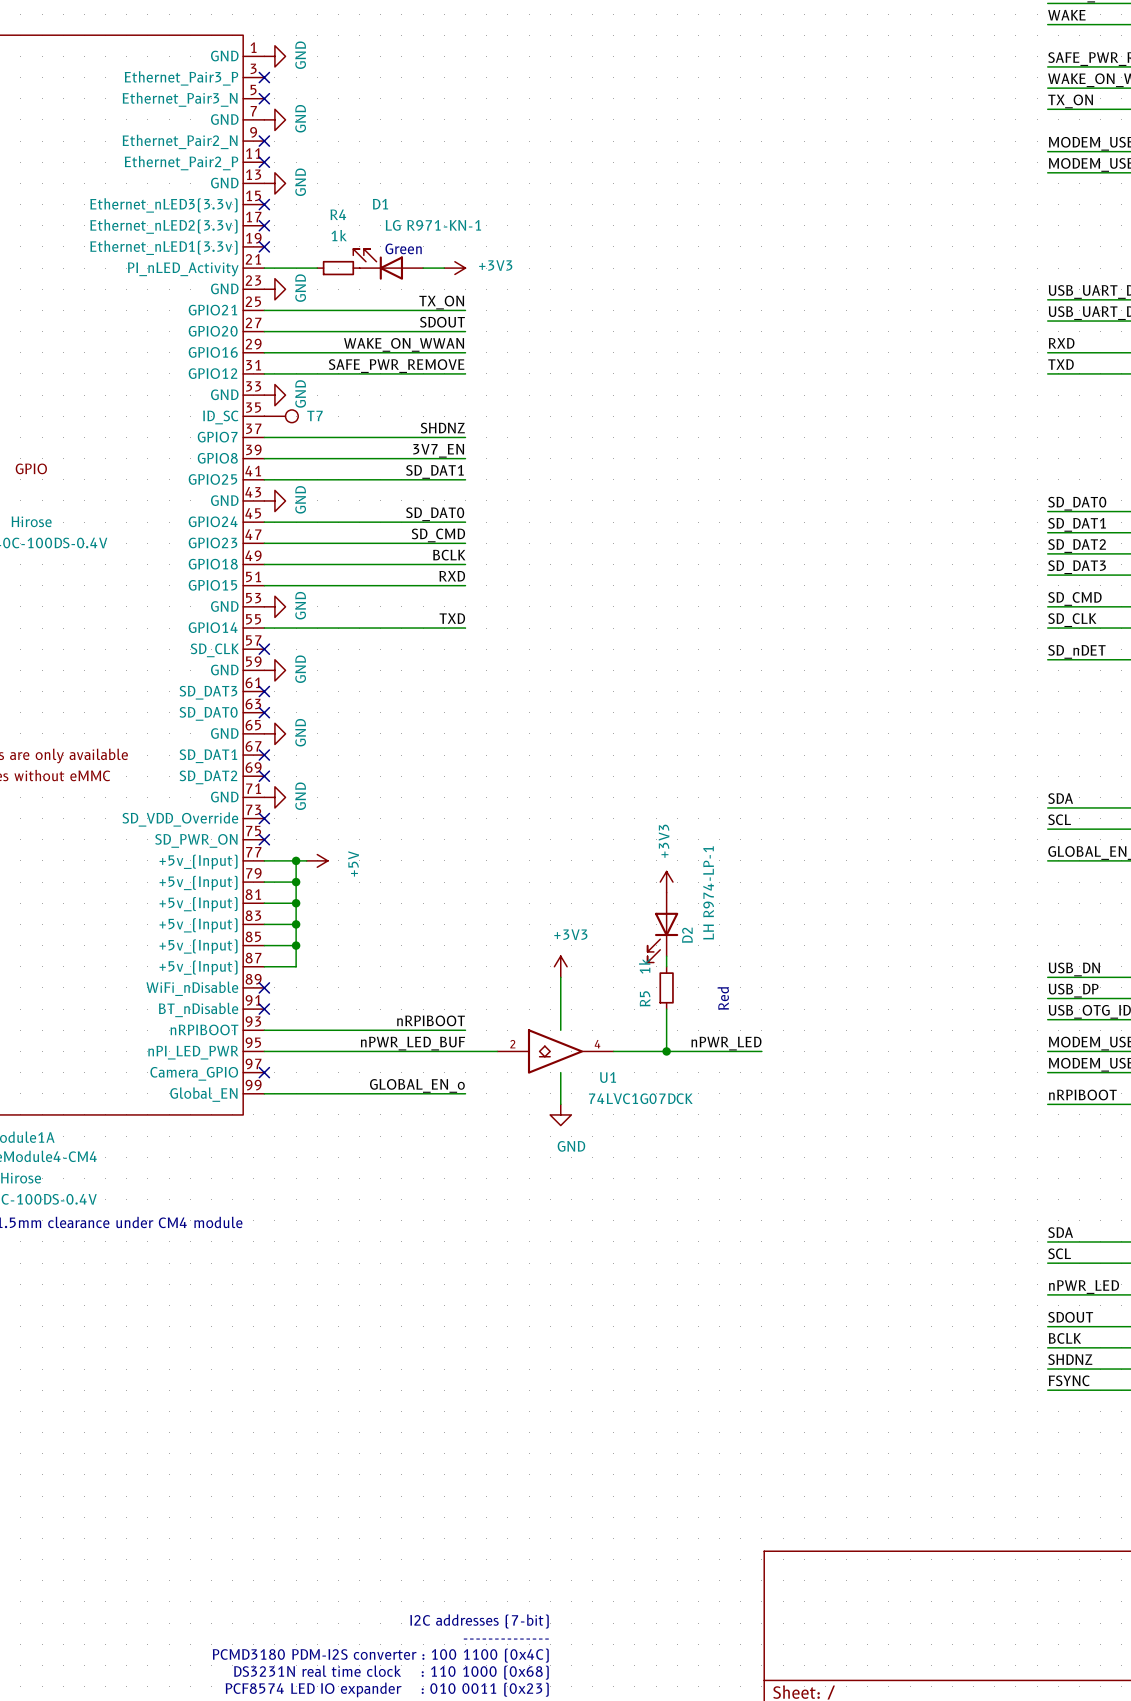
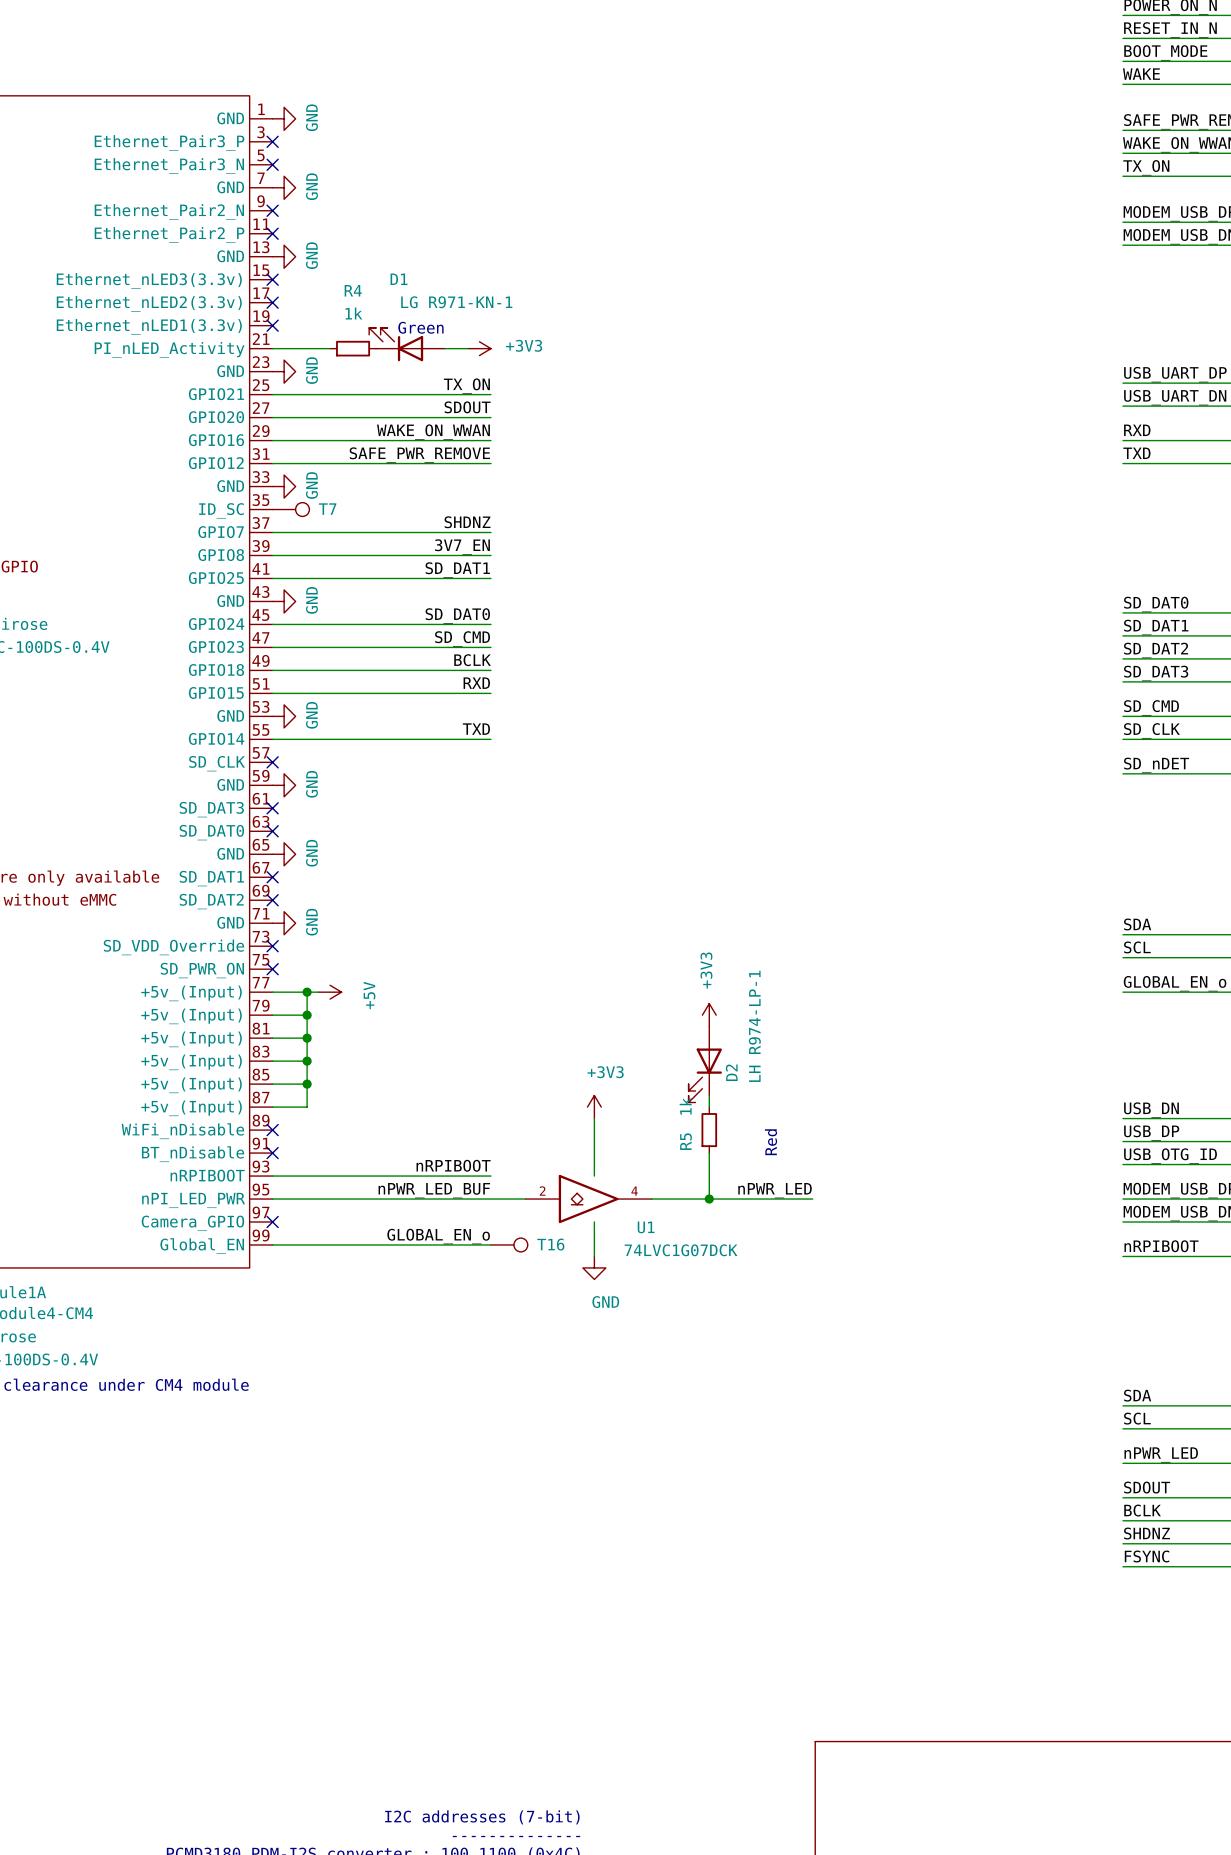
T16: none -> (509, 1244)

